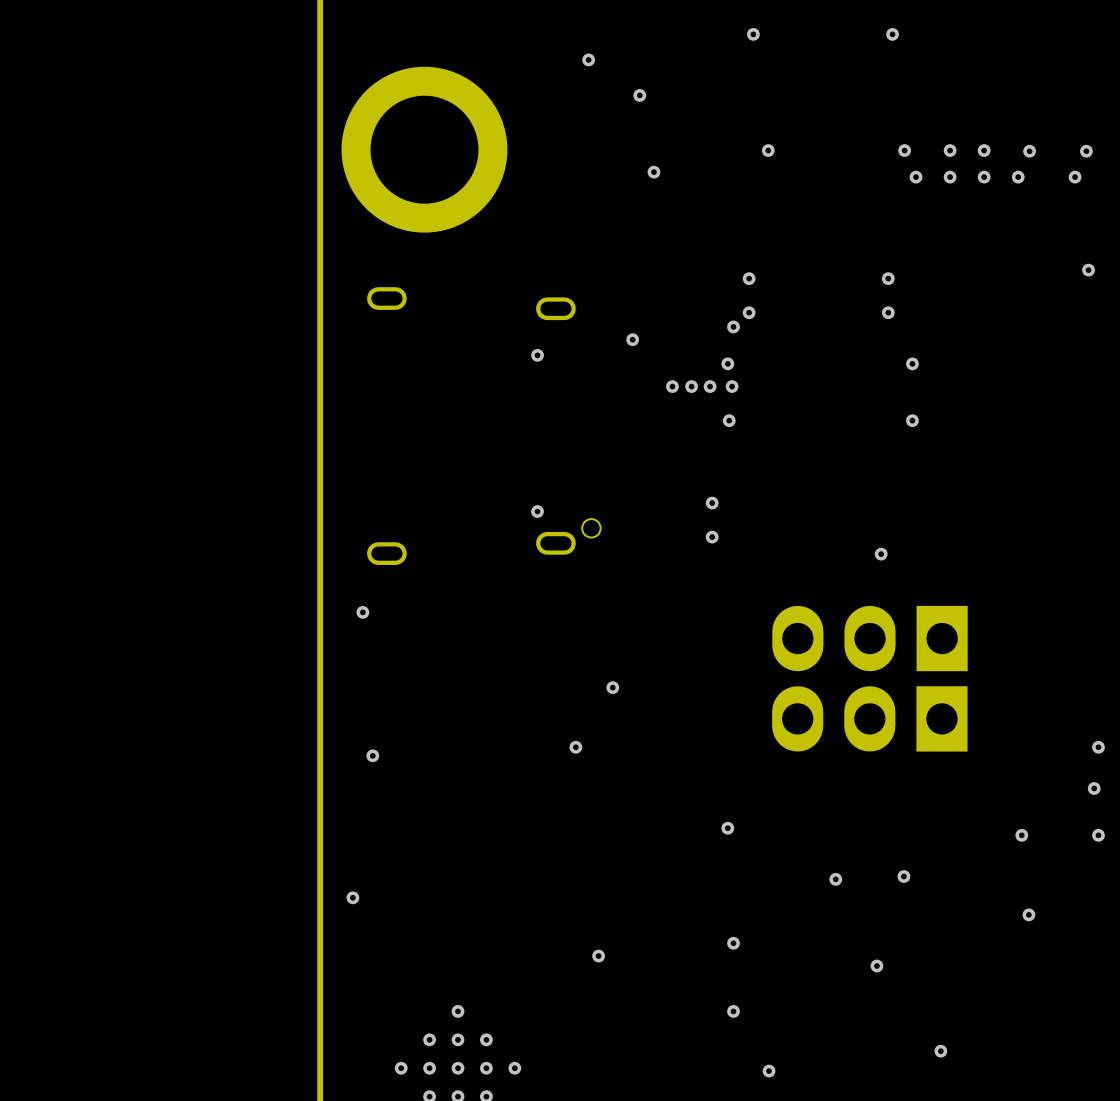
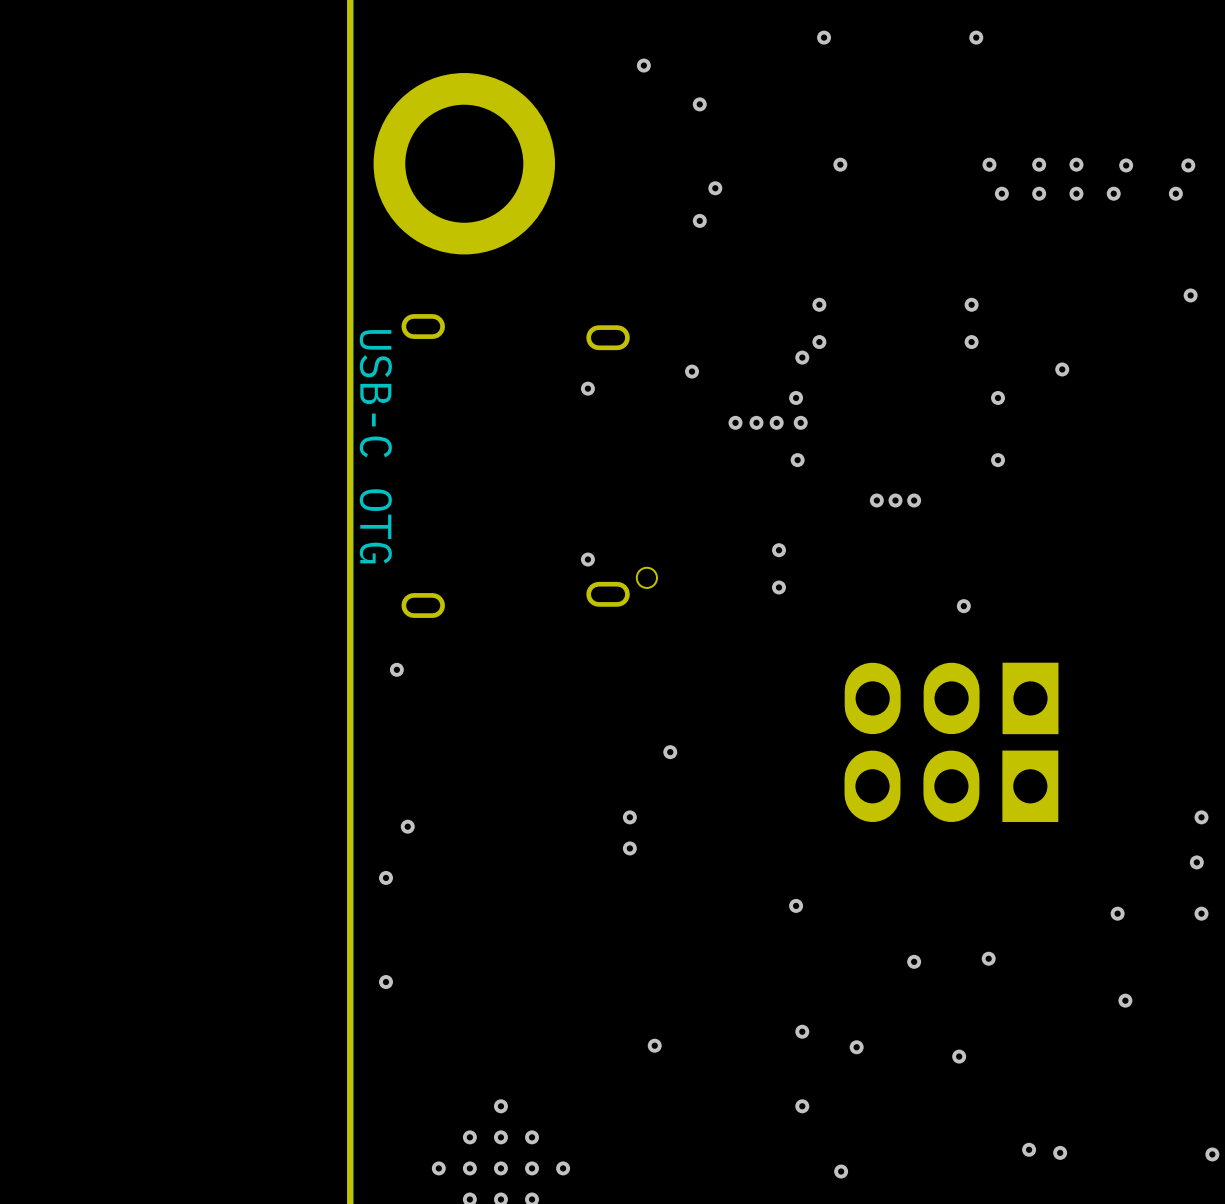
via: none -> (699, 220)
via: none -> (1062, 369)
text: none -> USB-C OTG (375, 446)
via: none -> (876, 500)
via: none -> (895, 500)
via: none -> (914, 500)
via: none -> (629, 848)
via: none -> (386, 877)
via: none -> (856, 1047)
via: none -> (1060, 1152)
via: none -> (1212, 1154)

